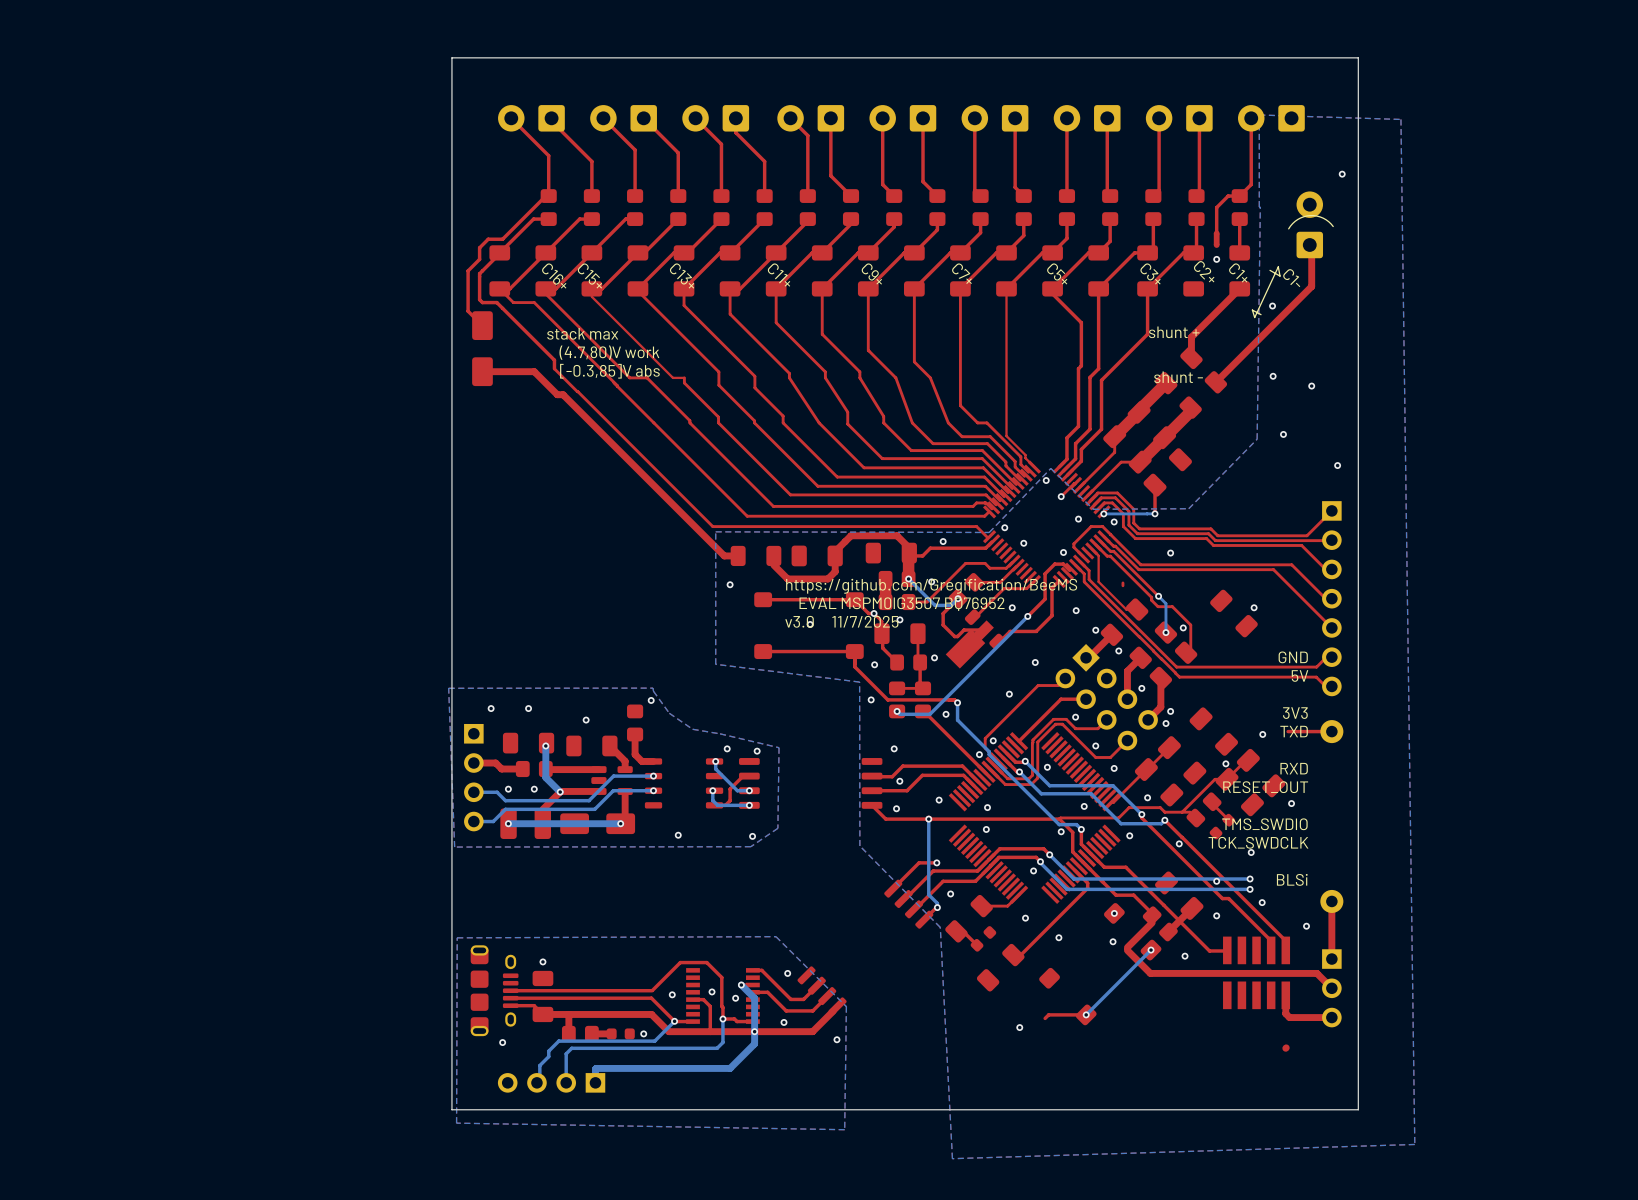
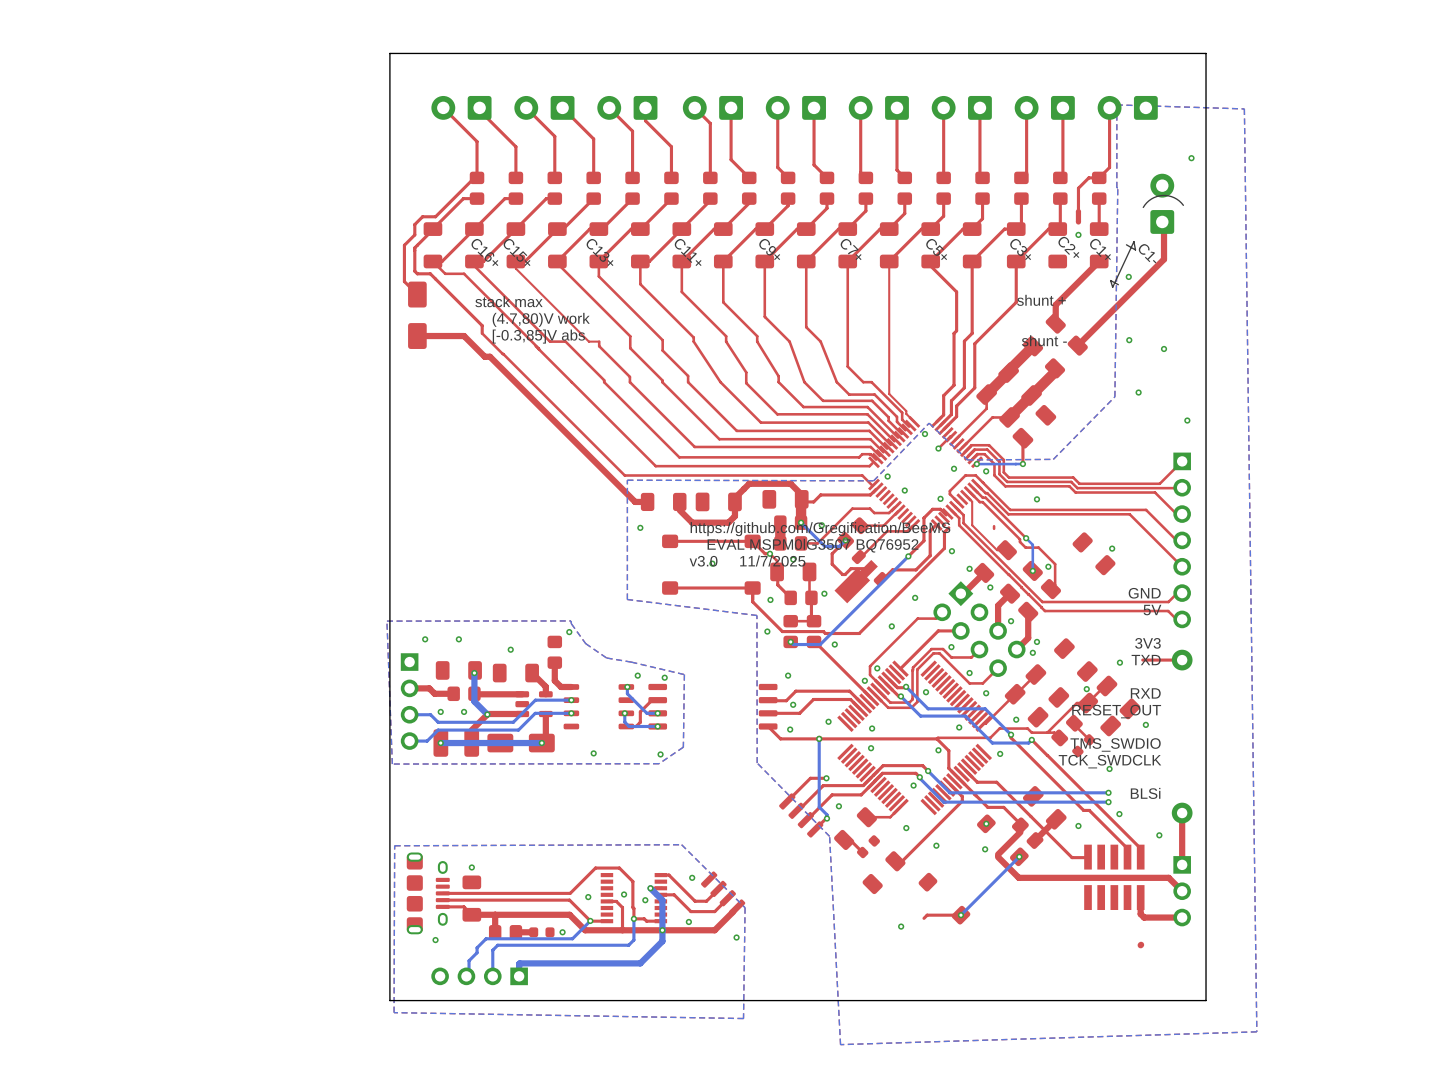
via: (943, 541) -> none
via: (1012, 607) -> none
top track: (933, 699) (954, 699) (957, 702) -> (823, 631) (825, 633) (859, 633) (944, 548) (944, 532) (948, 527)
bottom track: (957, 702) (957, 720) (989, 751) (989, 754) (1059, 824) (1076, 824) (1081, 829) -> none
via: (957, 702) -> none
top track: (1081, 829) (1081, 844) (1091, 854) -> none
via: (1081, 829) -> none
via: (1179, 843) -> none
via: (1216, 881) -> none
via: (1185, 956) -> none

